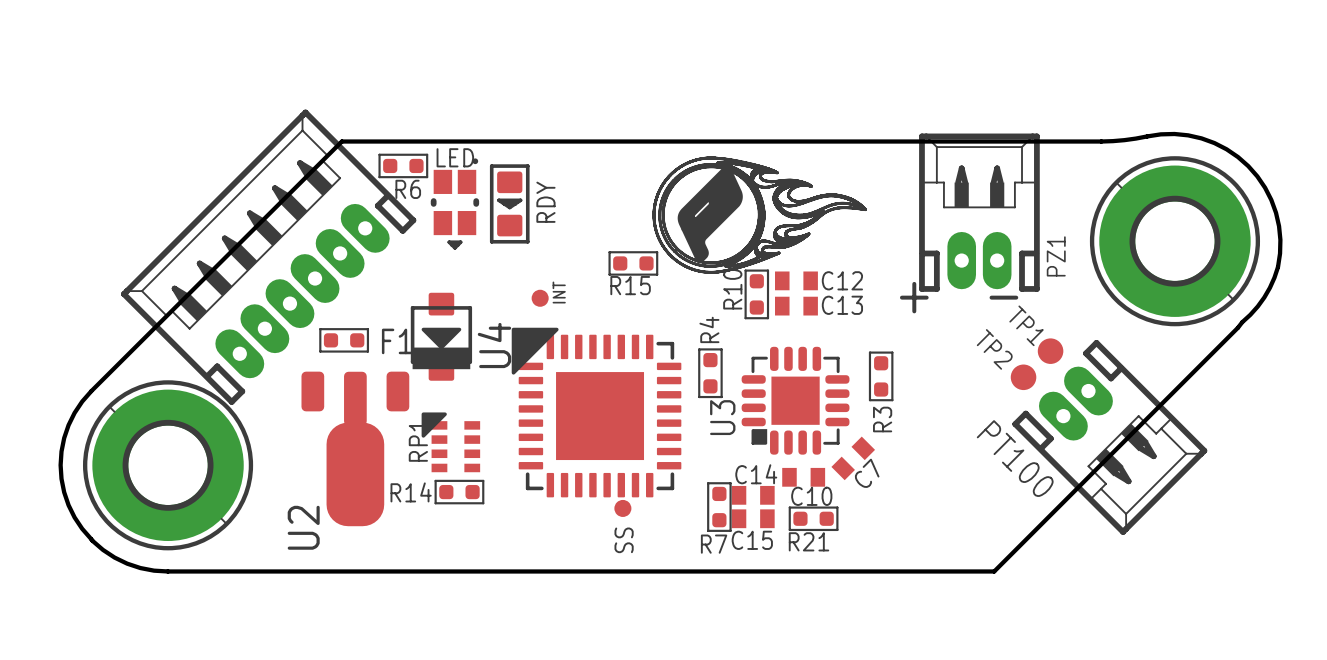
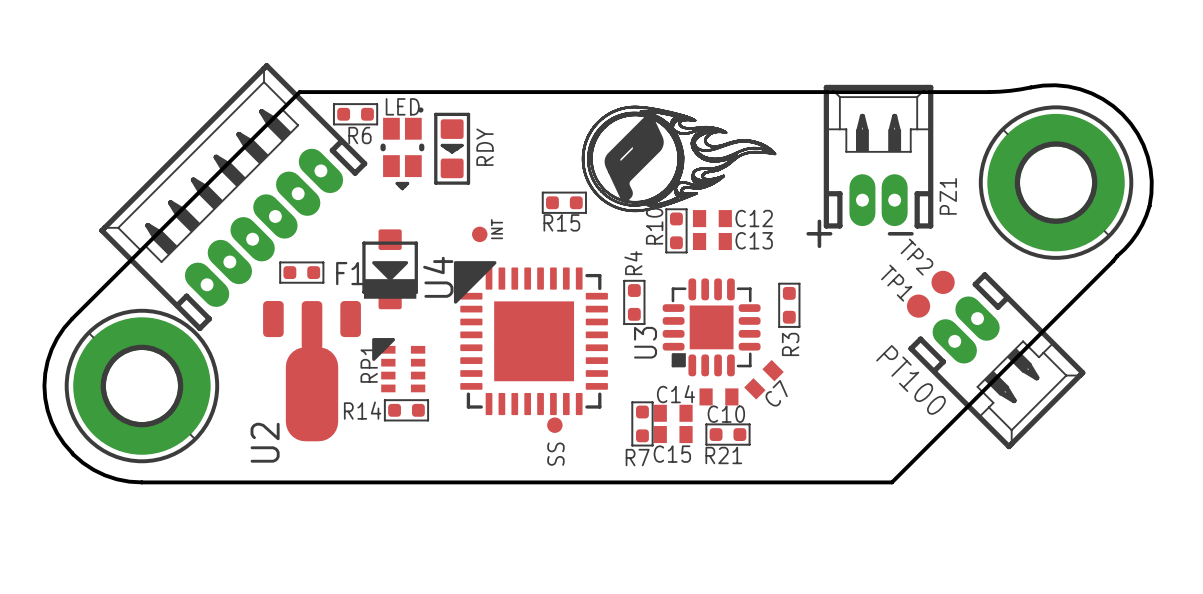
TP1 name: TP1 (1026, 325) -> TP2 (916, 257)
TP2 name: TP2 (994, 349) -> TP1 (896, 283)

